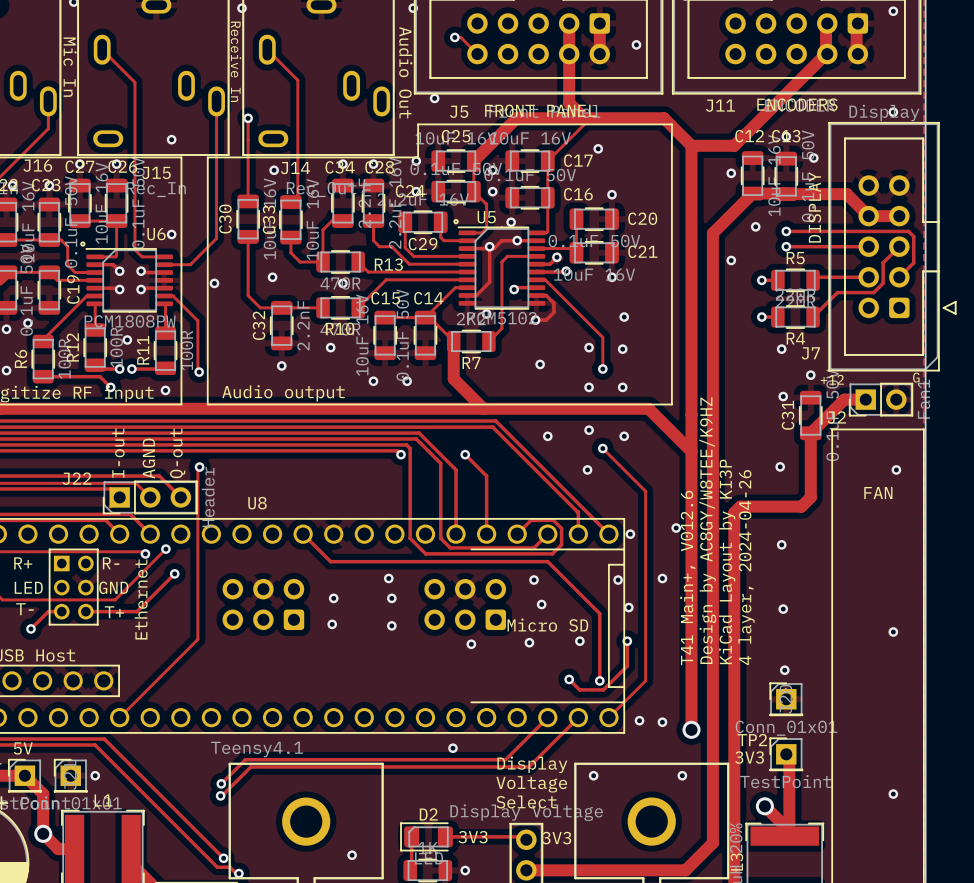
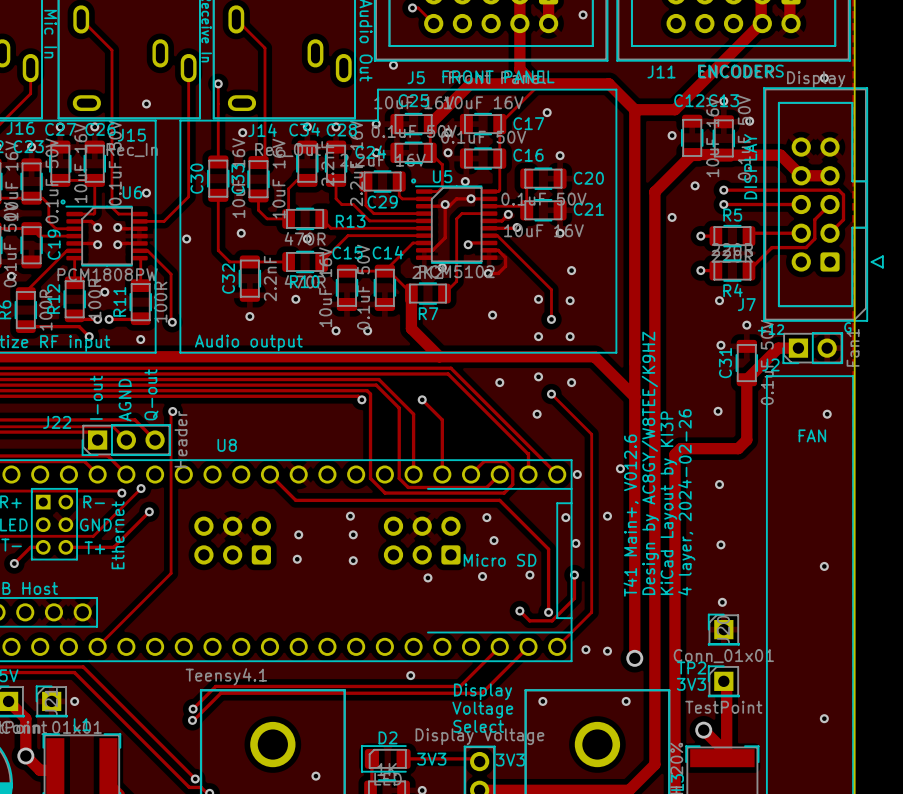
text: 4 layer, 2024-04-26 (746, 567) -> 4 layer, 2024-02-26 (686, 502)

